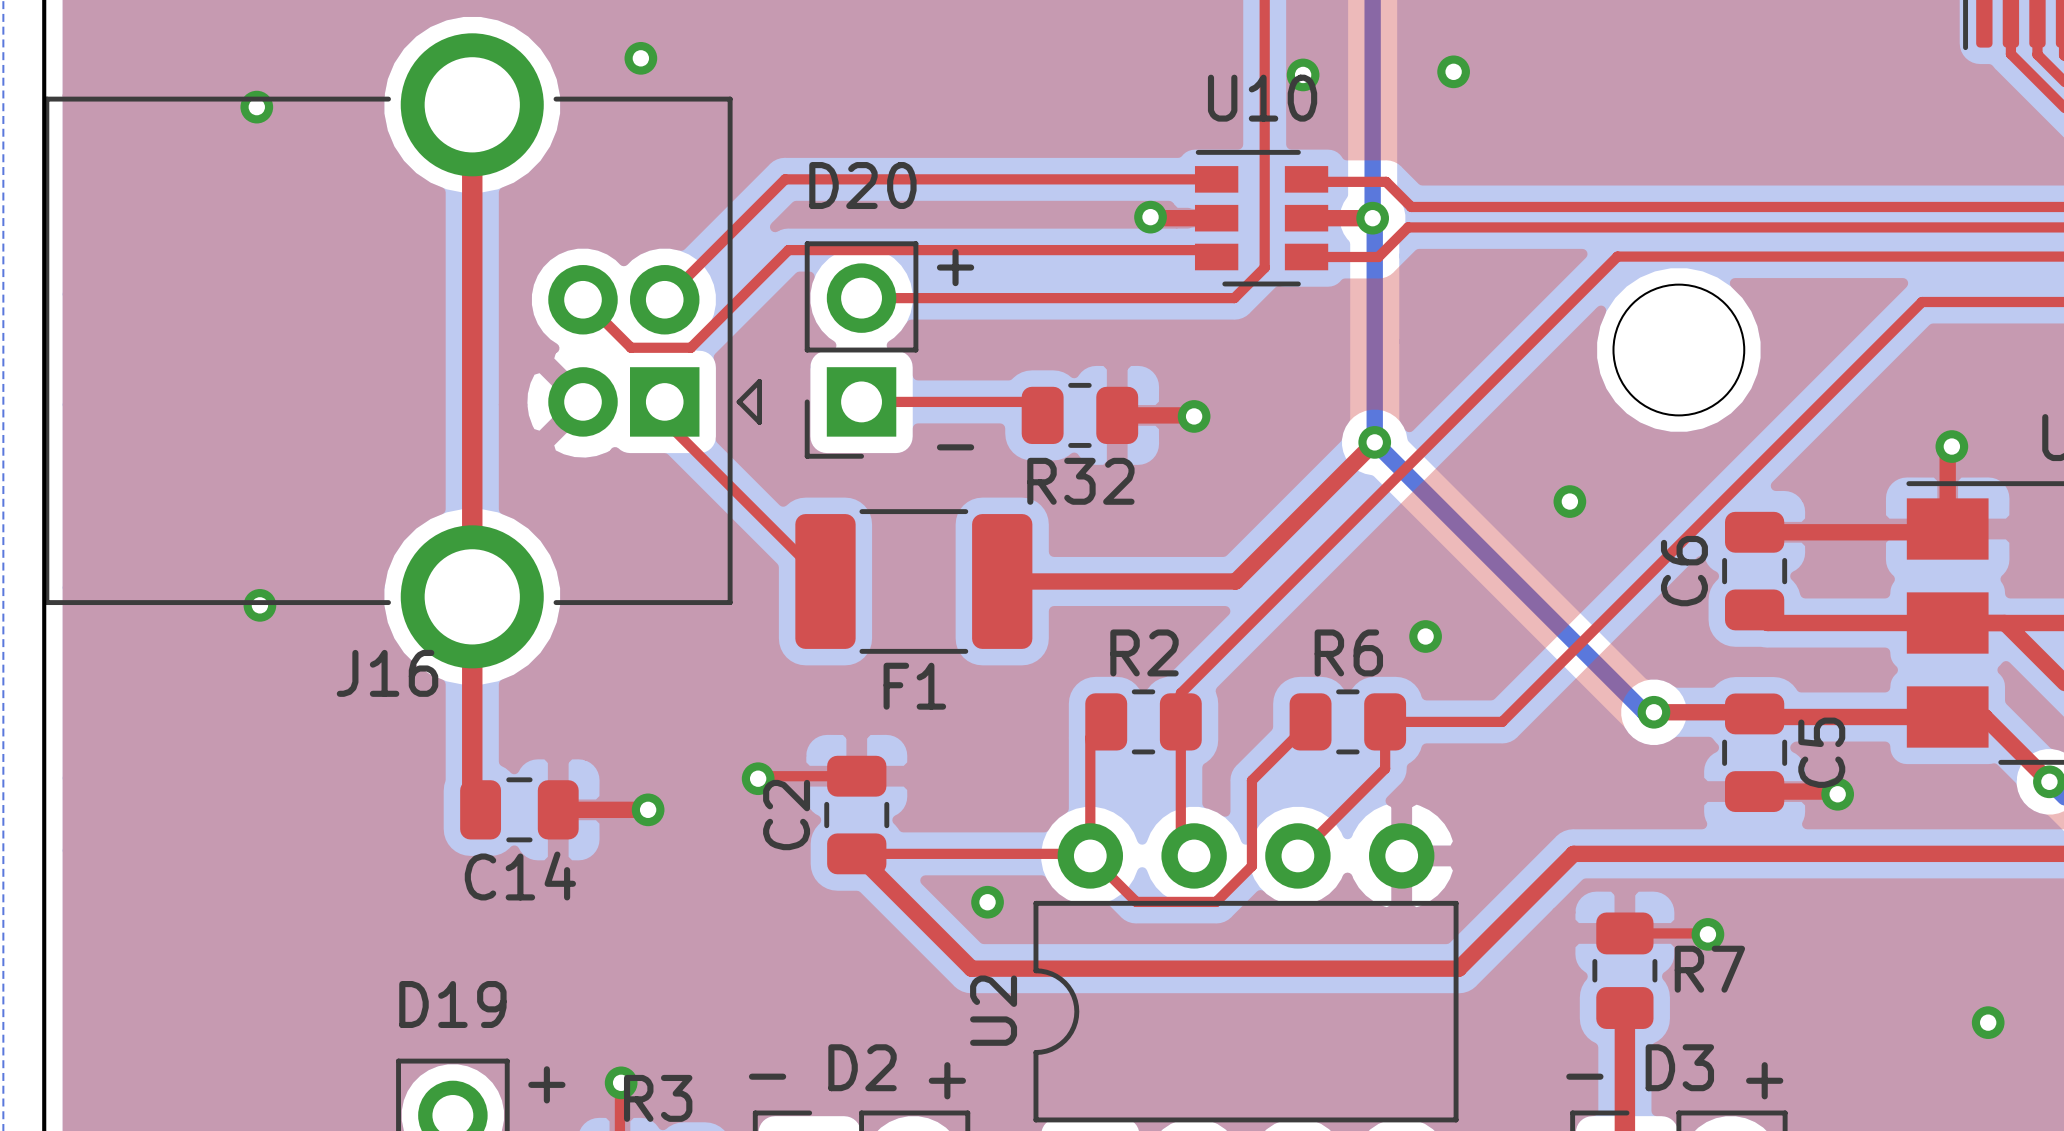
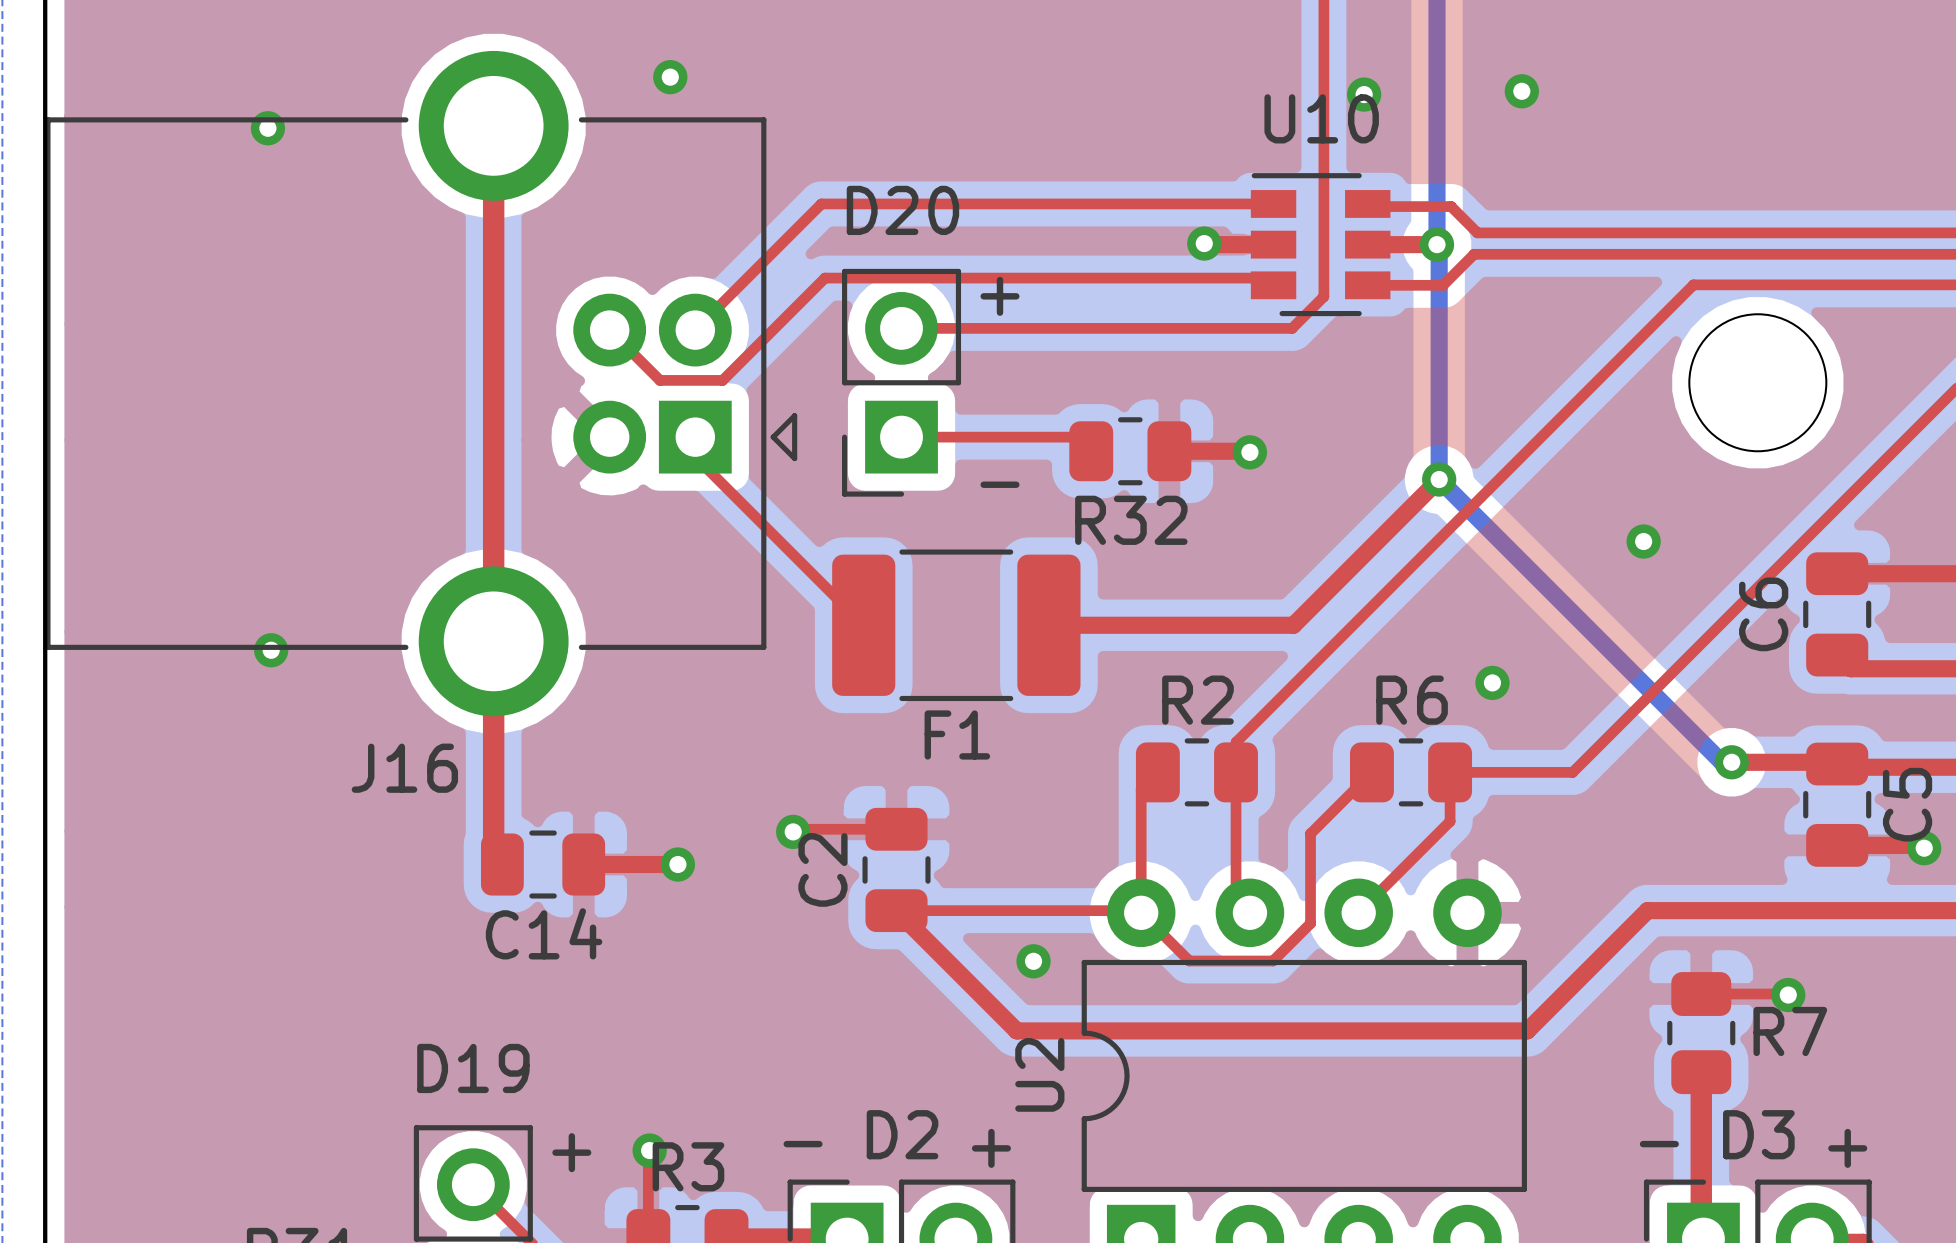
J16 name position: J16 (387, 673) -> J16 (404, 768)

